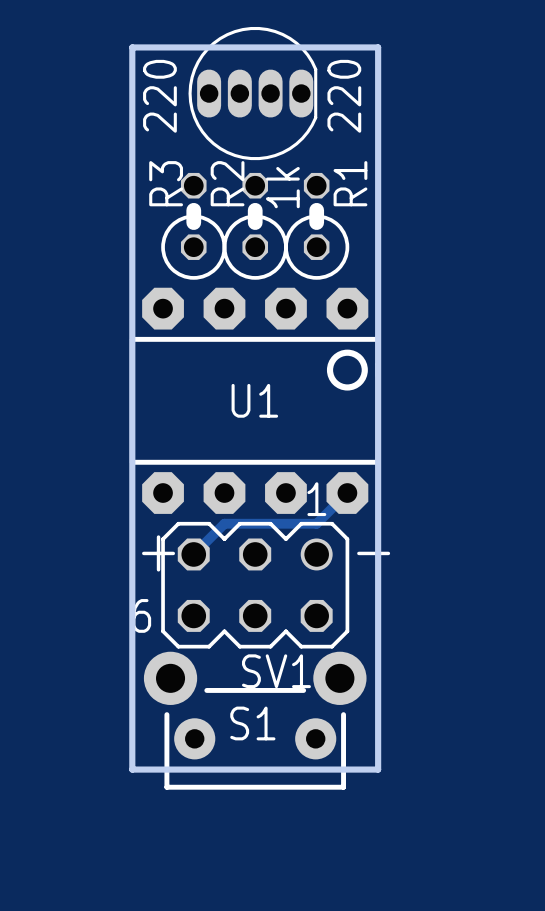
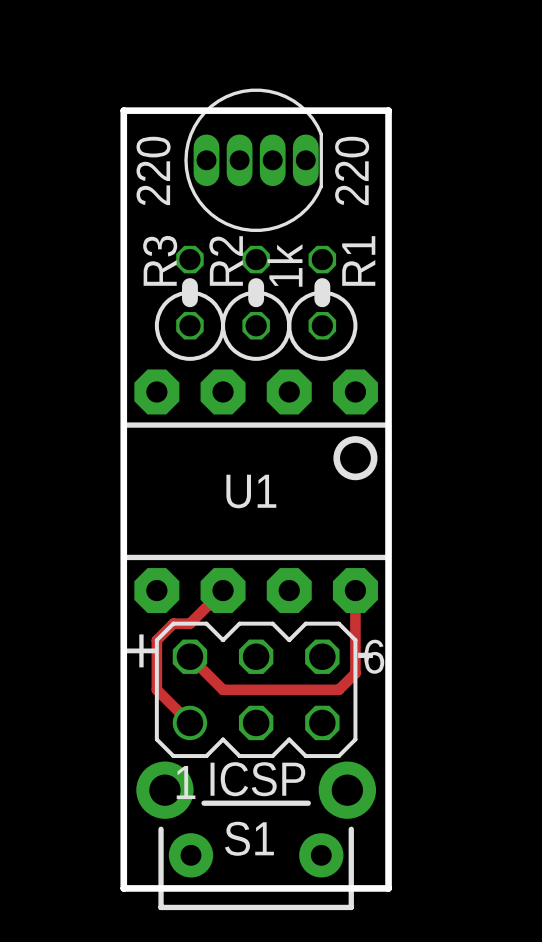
track: none -> (223, 590) (189, 623) (173, 623) (156, 640) (156, 689) (189, 722)
track: (347, 493) (316, 523) (224, 523) (193, 554) -> (355, 590) (355, 673) (338, 689) (223, 689) (189, 656)
SV1: (255, 585) -> none
ICSP: none -> (256, 689)

